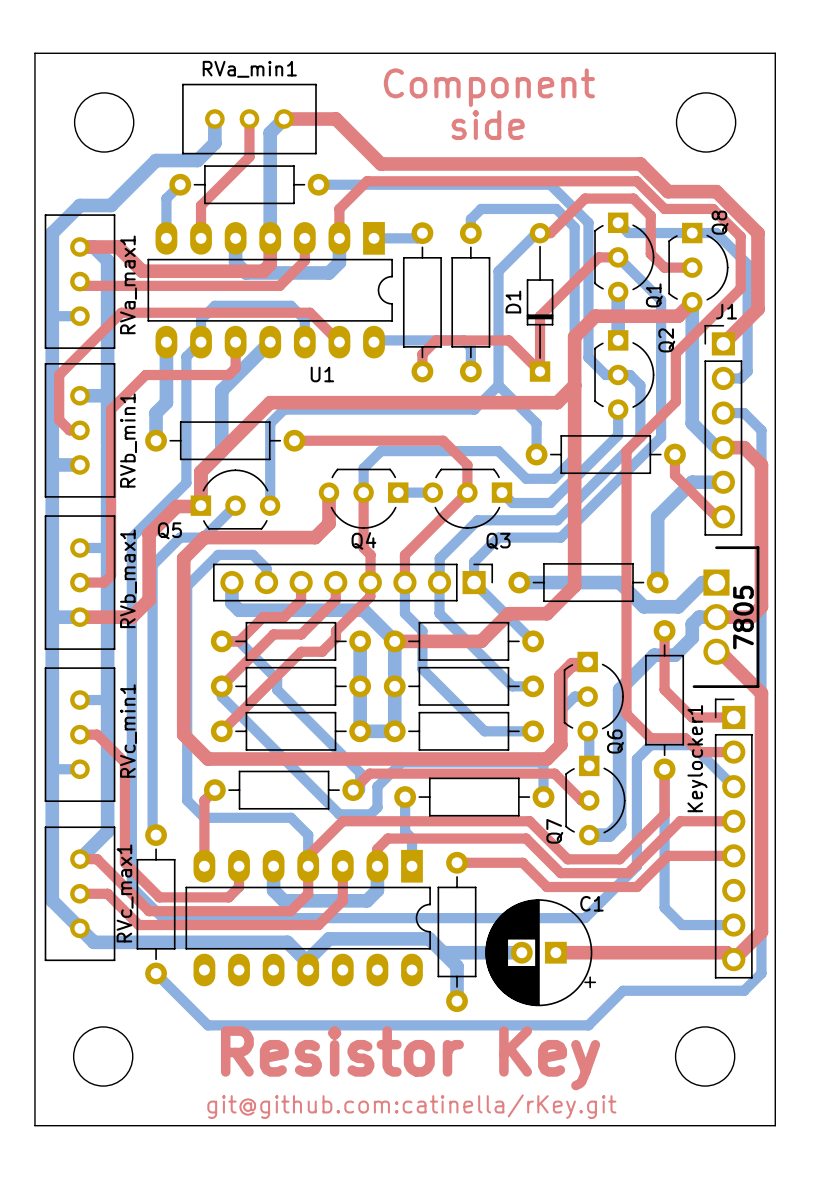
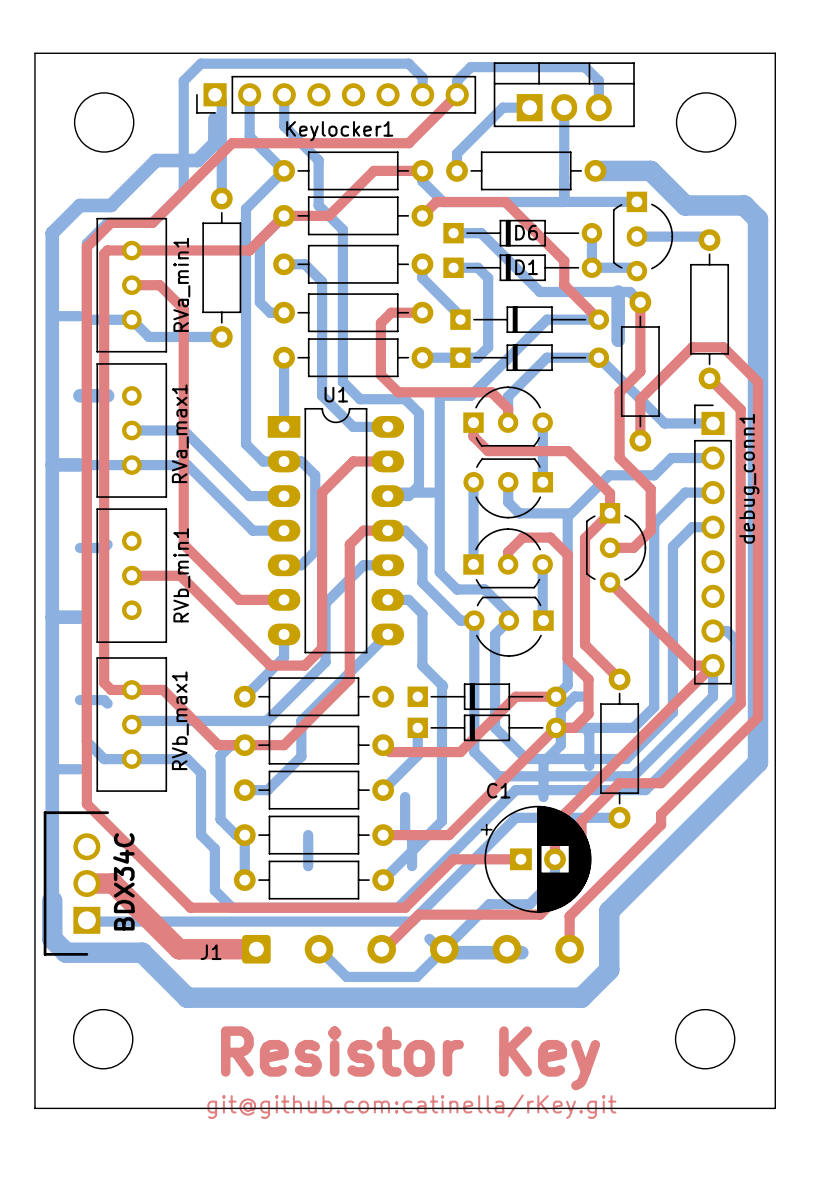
text: Component (489, 87) -> none
bottom track: none -> (215, 94) (221, 101) (221, 198)
bottom track: none -> (249, 94) (249, 136) (284, 170) (246, 208) (246, 444) (263, 461) (301, 461) (315, 475) (315, 551) (301, 565) (284, 565)
bottom track: none -> (284, 94) (284, 126) (318, 160) (318, 205) (342, 229) (342, 381) (360, 399) (405, 399) (418, 413) (418, 485) (408, 496) (387, 496)
bottom track: none -> (422, 94) (422, 77) (408, 63) (201, 63) (183, 80) (183, 191) (152, 222) (107, 222) (86, 243) (86, 741) (104, 759) (187, 759) (201, 772) (201, 835) (214, 848) (214, 890) (232, 907) (398, 907) (515, 790) (645, 790) (737, 698) (737, 641) (726, 630) (713, 630)
bottom track: none -> (457, 94) (457, 80) (470, 67) (585, 67) (598, 80) (598, 107)
top track: none -> (457, 94) (408, 143) (232, 143) (152, 222) (111, 222) (86, 247) (86, 803) (190, 907) (405, 907) (453, 859) (520, 859)
part: none -> (564, 94)
bottom track: none -> (529, 107) (502, 107) (457, 153) (457, 170)
bottom track: none -> (564, 107) (564, 202) (443, 202) (422, 181) (422, 170)
top track: (249, 119) (249, 157) (201, 205) (201, 238) -> none
RVa_min1 rotation: 0° (249, 119) -> 90° clockwise (131, 285)
RVa_min1 position: (249, 119) -> (131, 285)
bottom track: (284, 119) (270, 132) (270, 238) -> none
top track: (284, 119) (335, 119) (380, 163) (640, 163) (668, 191) (716, 191) (757, 233) (757, 309) (723, 343) -> none
text: side (488, 125) -> none
part: none -> (353, 170)
top track: none -> (422, 170) (374, 170) (329, 215) (284, 215) (249, 250) (107, 250) (104, 253) (104, 682) (111, 689) (163, 689) (218, 745) (284, 745) (349, 679) (349, 544) (363, 530) (387, 530)
part: none -> (526, 170)
bottom track: (180, 184) (166, 198) (166, 238) -> none
part: (249, 184) -> none
bottom track: (318, 184) (550, 184) (588, 222) (588, 357) (605, 375) (629, 375) (640, 385) (640, 437) (557, 520) (477, 520) (439, 558) -> (598, 319) (546, 319) (470, 395) (439, 395) (439, 558)
bottom track: none -> (564, 201) (636, 201)
bottom track: none -> (284, 215) (259, 240) (259, 302) (270, 312) (284, 312)
part: none -> (353, 215)
top track: none -> (422, 215) (436, 202) (505, 202) (564, 260) (564, 285) (598, 319)
bottom track: (618, 222) (628, 233) (716, 233) (747, 264) (747, 371) (740, 378) (723, 378) -> none
bottom track: (422, 233) (417, 238) (374, 238) -> none
bottom track: none -> (453, 233) (481, 233) (540, 291) (629, 291) (640, 302)
bottom track: (470, 233) (470, 219) (481, 208) (556, 208) (574, 227) (574, 458) (553, 478) (526, 478) (498, 451) (380, 451) (363, 468) (363, 492) -> none
D6: none -> (522, 233)
bottom track: (540, 233) (536, 233) (498, 271) (498, 385) -> none
top track: (540, 233) (550, 233) (585, 198) (633, 198) (650, 215) (650, 253) (664, 267) (692, 267) -> none
bottom track: none -> (591, 233) (591, 267) (633, 267) (636, 271)
bottom track: none -> (637, 236) (706, 236) (709, 240)
part: none -> (643, 236)
bottom track: (235, 238) (235, 262) (246, 272) (329, 272) (339, 262) (339, 238) -> none
top track: (270, 238) (270, 264) (263, 271) (142, 271) (118, 247) (79, 247) -> none
top track: (304, 238) (304, 260) (279, 285) (84, 285) (79, 281) -> none
top track: (339, 238) (339, 208) (367, 181) (636, 181) (664, 208) (712, 208) (740, 236) (740, 288) (675, 353) (675, 401) (626, 451) (626, 714) (650, 738) (685, 738) (699, 752) (733, 752) -> none
bottom track: (79, 247) (93, 247) (107, 260) (107, 444) -> none
bottom track: (618, 257) (661, 300) (661, 437) (560, 537) (498, 537) (474, 562) (474, 582) (533, 641) -> none
top track: (618, 257) (598, 257) (540, 316) (540, 371) (508, 340) (436, 340) (422, 354) (422, 371) -> none
Q1: (624, 257) -> none
bottom track: none -> (284, 264) (304, 264) (322, 281) (322, 395) (353, 426) (387, 426)
part: none -> (353, 264)
bottom track: none -> (422, 264) (422, 278) (460, 316) (460, 319)
part: none -> (221, 267)
bottom track: none -> (453, 267) (477, 267) (488, 278) (488, 347) (477, 357) (422, 357)
Q8: (698, 267) -> none
RVa_max1 position: (80, 281) -> (131, 430)
top track: none -> (131, 285) (159, 285) (183, 309) (183, 544) (239, 599) (284, 599)
U1 rotation: 0° (270, 290) -> 90° counterclockwise (335, 530)
U1 position: (270, 290) -> (335, 530)
part: (422, 302) -> none
part: (470, 302) -> none
D1 rotation: 0° (540, 302) -> 90° clockwise (522, 267)
top track: none -> (640, 302) (640, 371) (619, 392) (619, 458) (650, 489) (650, 530) (633, 547) (610, 547)
bottom track: (692, 302) (692, 423) (716, 447) (723, 447) -> none
top track: (692, 302) (678, 316) (595, 316) (574, 336) (574, 586) (546, 613) (508, 613) (481, 641) (394, 641) -> none
part: none -> (709, 309)
J1 name position: J1 (726, 311) -> J1 (211, 952)
part: none -> (353, 312)
top track: none -> (422, 312) (391, 312) (380, 323) (380, 375) (398, 392) (491, 392) (508, 408) (508, 422)
bottom track: none -> (87, 319) (131, 319) (149, 336) (221, 336)
part: none -> (529, 319)
J1 footprint: [704, 324, 743, 536] -> [242, 934, 584, 964]
bottom track: (166, 342) (166, 402) (156, 413) (156, 440) -> none
top track: (235, 342) (235, 368) (228, 375) (145, 375) (111, 409) (111, 575) (104, 582) (79, 582) -> none
bottom track: (270, 342) (221, 390) (221, 451) (201, 471) (201, 506) -> none
bottom track: (304, 342) (304, 319) (290, 305) (214, 305) (201, 319) (201, 342) (186, 356) (186, 483) (131, 537) (131, 886) (162, 918) (585, 918) (636, 866) (636, 758) (650, 745) (692, 745) (733, 786) -> none
top track: (339, 342) (310, 312) (121, 312) (59, 375) (59, 419) (69, 430) (79, 430) -> none
bottom track: (374, 342) (375, 340) (463, 340) (470, 347) (470, 371) -> none
bottom track: none -> (284, 357) (284, 426)
part: none -> (353, 357)
part: none -> (529, 357)
part: none -> (640, 371)
U1 name position: U1 (322, 374) -> U1 (336, 394)
Q2: (624, 375) -> none
top track: none -> (709, 378) (740, 409) (740, 703) (661, 783) (619, 783) (581, 821) (581, 873) (540, 914) (418, 914) (384, 949) (381, 949)
bottom track: (498, 385) (474, 409) (284, 409) (270, 423) (270, 509) -> none
bottom track: (498, 385) (536, 423) (536, 454) -> none
top track: (574, 385) (557, 402) (270, 402) (200, 472) (200, 505) -> none
bottom track: (618, 409) (618, 435) (550, 503) (512, 503) (501, 492) -> none
bottom track: (723, 413) (744, 413) (761, 430) (761, 973) (744, 990) (623, 990) (588, 1025) (207, 1025) (156, 973) -> none
part: none -> (508, 416)
top track: none -> (473, 422) (473, 436) (488, 451) (567, 451) (610, 493) (610, 513) (585, 538) (585, 644) (619, 679)
bottom track: none -> (508, 422) (508, 396) (546, 357) (598, 357) (664, 423) (713, 423)
bottom track: none -> (542, 422) (542, 482)
RVb_min1 position: (80, 430) -> (131, 575)
bottom track: none -> (131, 430) (183, 430) (249, 496) (284, 496)
RVb_min1 name position: RVb_min1 (128, 440) -> RVb_min1 (181, 575)
part: (225, 440) -> none
top track: (294, 440) (443, 440) (467, 464) (467, 492) (404, 555) (404, 582) -> none
top track: none -> (640, 440) (640, 399) (692, 347) (723, 347) (757, 381) (757, 717) (661, 814) (661, 824) (569, 916) (569, 949)
bottom track: (107, 447) (107, 831) (79, 859) -> none
top track: (723, 447) (744, 447) (761, 464) (761, 606) (751, 617) (722, 617) -> none
part: (605, 454) -> none
top track: (674, 454) (674, 475) (718, 519) (726, 519) -> none
bottom track: none -> (713, 458) (671, 458) (654, 475) (609, 475) (567, 516) (567, 685) (556, 696)
top track: none -> (387, 461) (353, 461) (322, 492) (322, 648) (304, 665) (270, 665) (180, 575) (131, 575)
bottom track: none -> (86, 465) (187, 465) (252, 530) (284, 530)
bottom track: none -> (473, 482) (473, 564)
bottom track: none -> (508, 482) (508, 502) (519, 513) (567, 513)
bottom track: (723, 482) (692, 482) (657, 516) (657, 582) -> none
part: none -> (508, 488)
top track: (329, 492) (329, 523) (315, 537) (204, 537) (183, 558) (183, 734) (207, 758) (546, 758) (560, 745) (560, 675) (572, 664) (585, 664) -> none
top track: (363, 492) (363, 547) (370, 554) (370, 596) (335, 630) (335, 637) (322, 651) (301, 651) (221, 731) -> none
bottom track: none -> (713, 492) (685, 492) (654, 523) (654, 707) (633, 727) (556, 727)
Q4: (363, 498) -> none
Q3: (467, 498) -> none
Q5: (235, 499) -> none
bottom track: (235, 505) (203, 537) (180, 537) (152, 565) (152, 831) (156, 835) -> none
top track: (201, 506) (176, 506) (149, 534) (149, 599) (131, 617) (79, 617) -> none
bottom track: none -> (387, 530) (405, 530) (422, 547) (422, 582) (460, 620) (474, 620) (474, 752) (498, 776) (633, 776) (713, 696) (713, 665)
debug_conn1: none -> (713, 544)
part: none -> (616, 547)
part: none -> (508, 558)
top track: none -> (508, 564) (508, 552) (522, 537) (550, 537) (567, 554) (567, 658) (588, 679) (588, 714) (574, 727) (556, 727) (448, 835) (383, 835)
bottom track: none -> (542, 564) (543, 620)
bottom track: none -> (387, 565) (363, 565) (325, 603) (325, 662) (266, 720) (135, 720) (131, 724)
bottom track: (439, 572) (439, 613) (512, 686) (533, 686) -> (439, 572) (457, 589) (484, 589) (508, 613) (508, 620) (495, 634) (495, 727) (526, 758) (626, 758) (672, 712) (672, 546) (692, 527) (713, 527)
RVb_max1 position: (80, 582) -> (131, 724)
bottom track: (231, 582) (231, 603) (239, 610) (363, 610) (394, 641) (394, 731) (360, 731) (360, 641) -> none
bottom track: (266, 582) (266, 568) (252, 554) (218, 554) (187, 586) (187, 800) (204, 817) (290, 817) (308, 835) -> none
top track: (301, 582) (301, 600) (284, 617) (263, 617) (239, 641) (221, 641) -> none
top track: (335, 582) (335, 600) (301, 634) (273, 634) (221, 686) -> none
part: (353, 582) -> none
bottom track: (404, 582) (404, 613) (422, 630) -> (387, 599) (408, 599) (422, 613) (422, 630)
bottom track: (519, 582) (619, 582) (643, 606) (678, 606) (702, 582) (716, 582) -> none
part: (588, 582) -> none
top track: none -> (610, 582) (693, 665) (713, 665) (554, 823) (554, 859)
bottom track: (716, 617) (699, 617) (692, 624) (692, 637) (674, 655) (654, 655) (619, 689) (619, 824) (609, 835) (589, 835) -> none
part: 7805 (726, 617) -> none
part: none -> (508, 626)
top track: (664, 630) (664, 689) (692, 717) (733, 717) -> none
bottom track: none -> (284, 634) (284, 657) (244, 696)
bottom track: none -> (387, 634) (301, 720) (301, 756) (267, 790) (244, 790)
bottom track: (221, 641) (239, 641) (277, 679) (277, 689) (360, 772) (360, 790) -> none
part: (290, 641) -> none
part: (463, 641) -> none
top track: (716, 651) (719, 651) (761, 693) (761, 931) (733, 959) (726, 952) (555, 952) -> none
bottom track: (422, 665) (422, 669) (484, 731) (533, 731) -> (422, 665) (443, 686)
bottom track: none -> (441, 684) (441, 821) (383, 880)
bottom track: (221, 686) (221, 696) (339, 814) (370, 814) (377, 807) (377, 786) (401, 762) (543, 762) -> none
part: (290, 686) -> none
part: (463, 686) -> none
part: none -> (313, 696)
part: none -> (486, 696)
top track: none -> (556, 696) (515, 696) (460, 752) (390, 752) (383, 745)
Q6: (593, 696) -> none
part position: (664, 700) -> (619, 748)
bottom track: none -> (417, 727) (417, 755) (383, 790)
part: none -> (486, 727)
part: (290, 731) -> none
part: (463, 731) -> none
top track: (79, 734) (97, 734) (124, 762) (124, 862) (159, 897) (228, 897) (239, 887) (239, 866) -> none
RVc_min1: (80, 734) -> none
bottom track: none -> (244, 745) (230, 745) (220, 755) (220, 819) (236, 835) (244, 835) (244, 880)
part: none -> (313, 745)
Keylocker1 name position: Keylocker1 (697, 758) -> Keylocker1 (339, 131)
bottom track: (664, 769) (664, 907) (681, 925) (733, 925) -> none
top track: (664, 769) (664, 814) (619, 859) (567, 859) (529, 821) (342, 821) (308, 855) (308, 893) (290, 911) (149, 911) (97, 859) (79, 859) -> none
top track: (214, 790) (204, 800) (204, 866) -> none
part: (284, 790) -> none
part: none -> (313, 790)
top track: (353, 790) (369, 773) (554, 773) (581, 800) (589, 800) -> none
part: (474, 797) -> none
Q7: (595, 800) -> none
bottom track: none -> (619, 817) (515, 817) (412, 921) (86, 920)
top track: (733, 821) (680, 821) (628, 873) (560, 873) (526, 838) (387, 838) (377, 849) (377, 866) -> none
part: none -> (313, 835)
Keylocker1 rotation: 0° (733, 838) -> 90° counterclockwise (336, 94)
Keylocker1 position: (733, 838) -> (336, 94)
top track: (733, 855) (668, 855) (636, 886) (546, 886) (522, 862) (457, 862) -> none
bottom track: none -> (554, 859) (554, 878) (529, 904) (489, 904) (416, 976) (346, 976) (319, 949)
bottom track: (273, 866) (273, 890) (283, 900) (367, 900) (377, 890) (377, 866) -> none
top track: (342, 866) (342, 900) (318, 925) (138, 925) (107, 893) -> none
part: none -> (313, 880)
part: none -> BDX34C (76, 883)
top track: none -> (86, 883) (113, 883) (179, 949) (256, 949)
top track: (79, 893) (107, 893) -> none
RVc_max1: (80, 893) -> none
bottom track: (52, 900) (93, 942) (287, 942) (308, 963) -> (52, 900) (52, 938) (66, 952) (142, 952) (187, 997) (581, 997) (609, 970) (609, 911) (757, 762) (757, 219) (744, 205) (685, 205) (650, 170) (595, 170)
C1 name position: C1 (591, 903) -> C1 (498, 790)
part: (156, 904) -> none
part: (308, 918) -> none
part: (457, 931) -> none
C1 rotation: 0° (540, 952) -> 180° (536, 859)
C1 position: (540, 952) -> (536, 859)
bottom track: (308, 970) (308, 959) (329, 938) (429, 938) (457, 966) (457, 1001) -> none
round board edge position: (103, 1056) -> (103, 1039)
round board edge position: (705, 1056) -> (705, 1039)
board edge: (34, 1108) (34, 1125) (775, 1125) (775, 1108) -> (34, 1108) (775, 1108)

